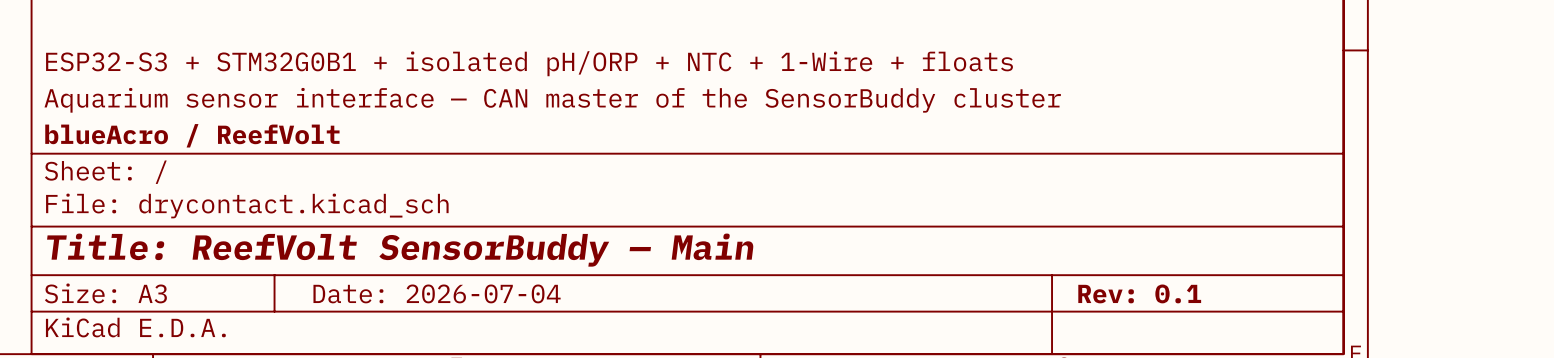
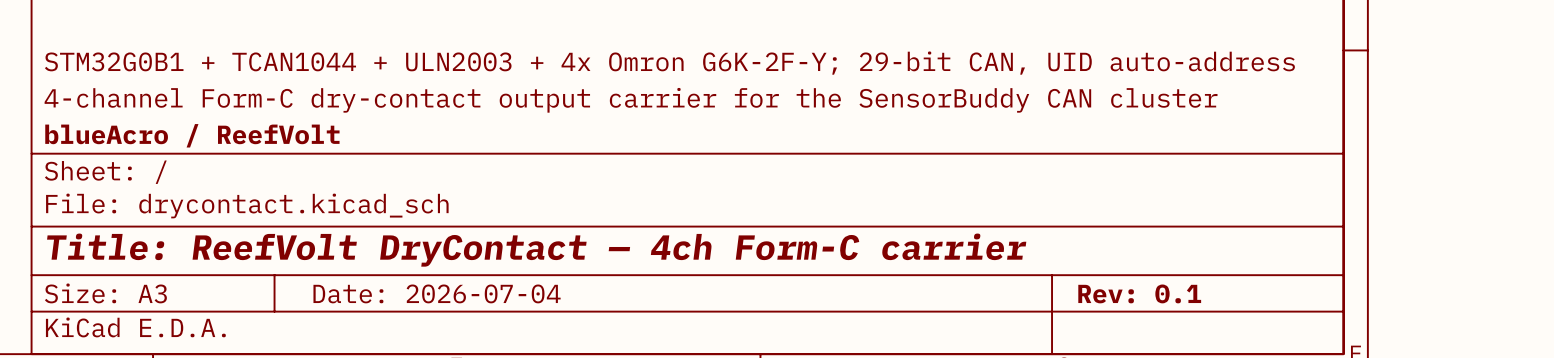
title block: ESP32-S3 + STM32G0B1 + isolated pH/ORP + NTC + 1-Wire + floats (529, 63) -> STM32G0B1 + TCAN1044 + ULN2003 + 4x Omron G6K-2F-Y; 29-bit CAN, UID auto-address (669, 63)
title block: Aquarium sensor interface — CAN master of the SensorBuddy cluster (552, 100) -> 4-channel Form-C dry-contact output carrier for the SensorBuddy CAN cluster (631, 100)
title block: Title: ReefVolt SensorBuddy — Main (400, 250) -> Title: ReefVolt DryContact — 4ch Form-C carrier (536, 250)

